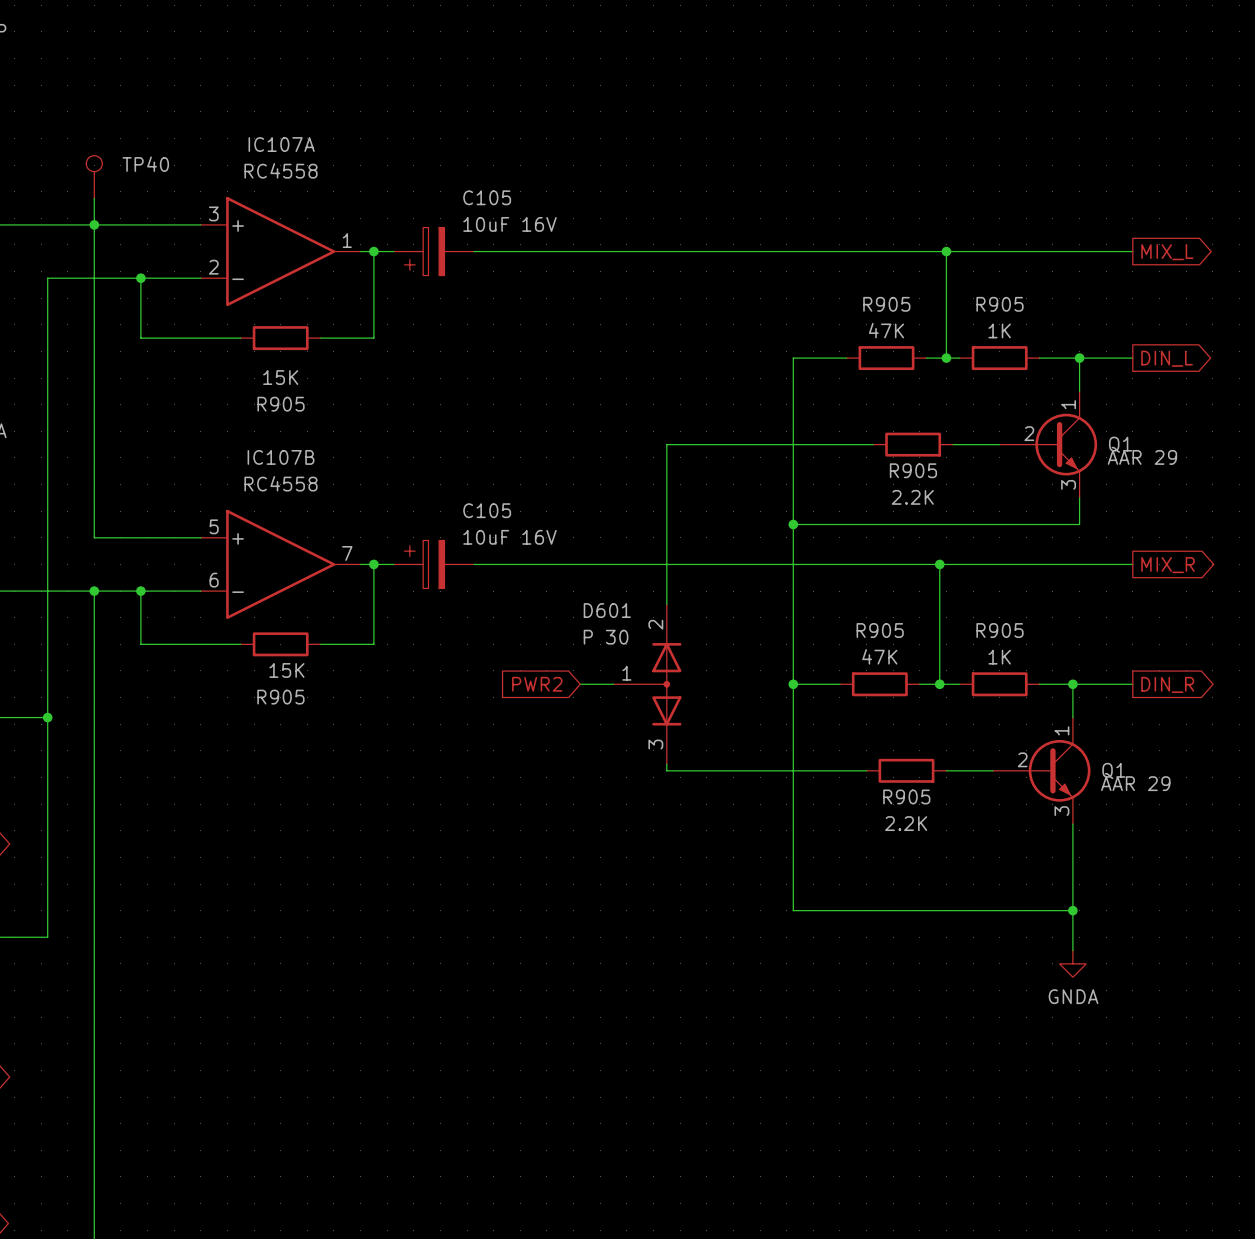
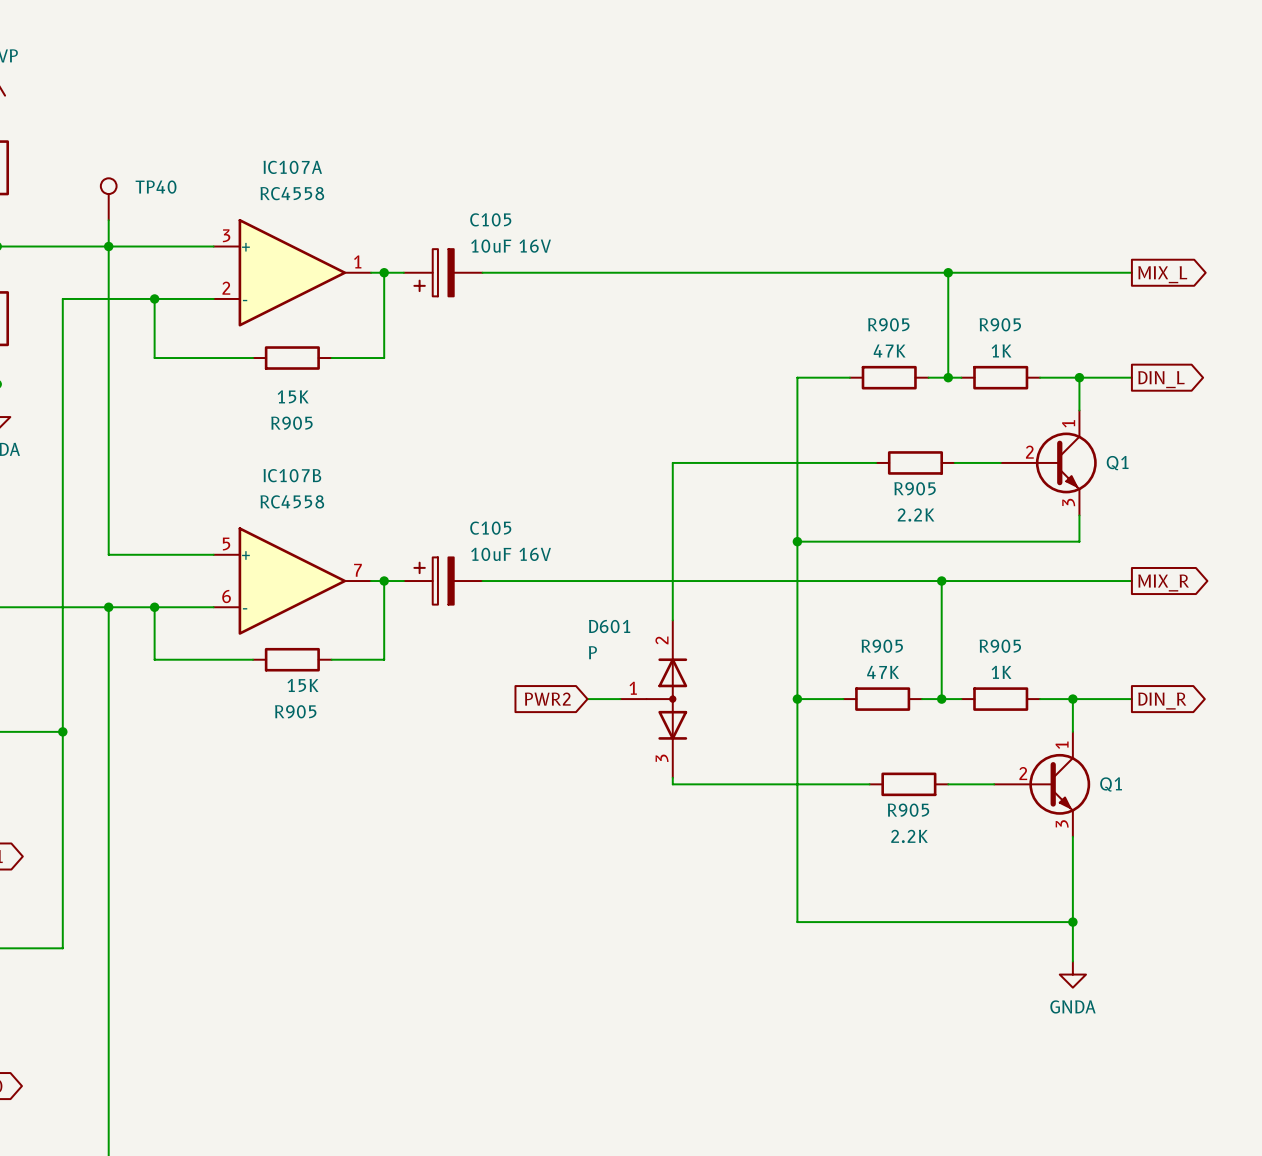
Q1 value: AAR 29 (1142, 457) -> none
D601 value: P 30 (606, 637) -> P (592, 652)
Q1 value: AAR 29 (1135, 783) -> none

